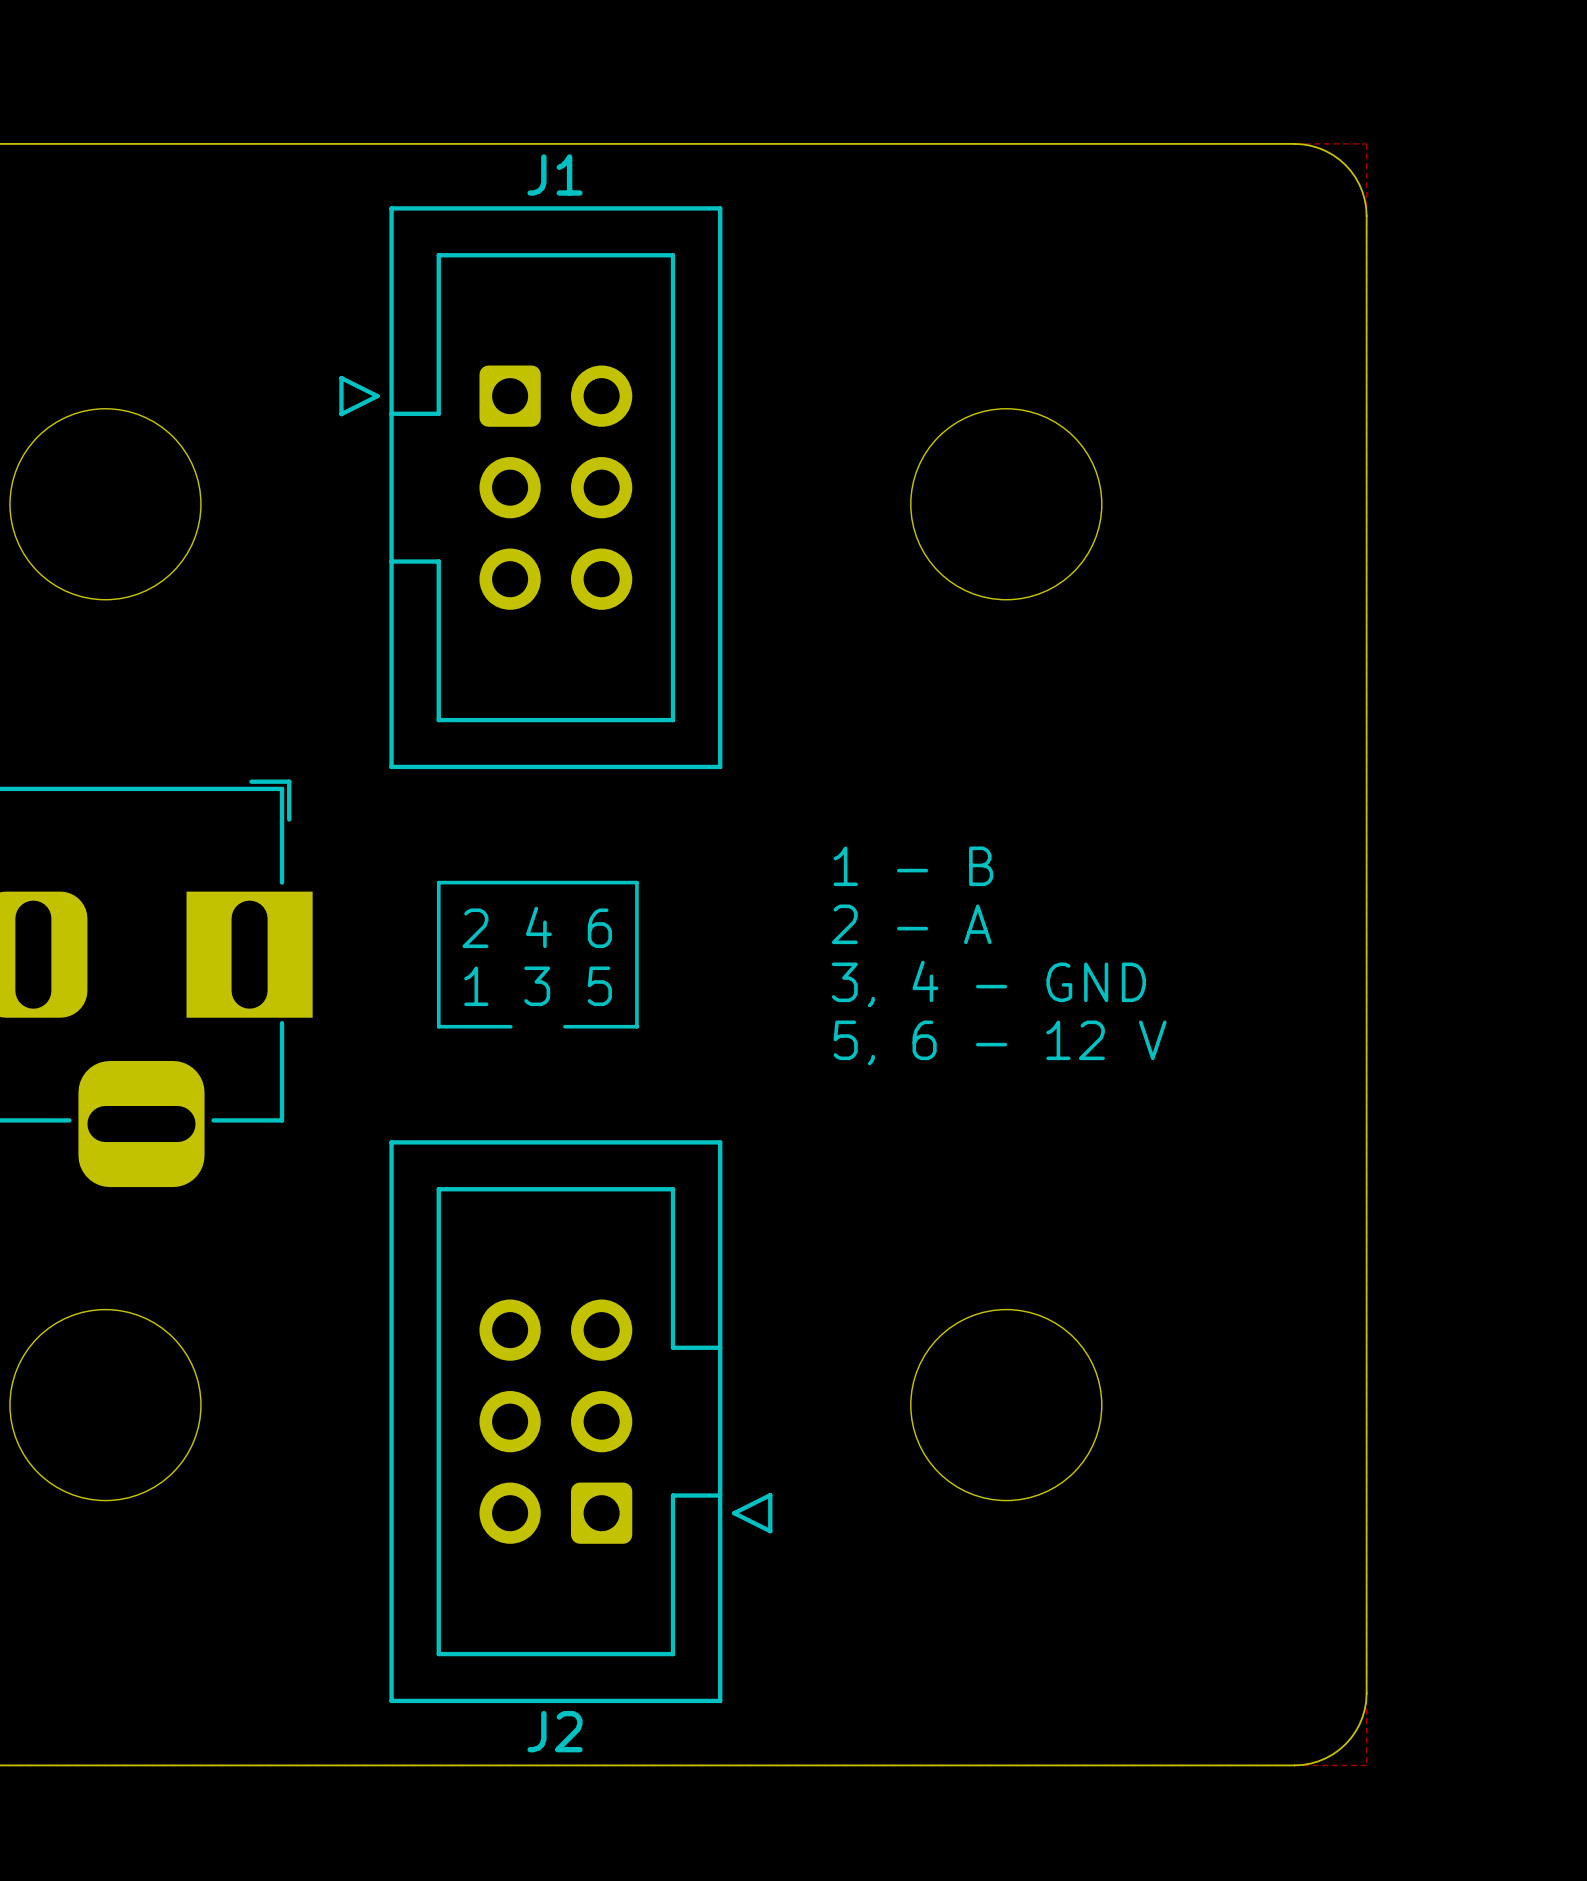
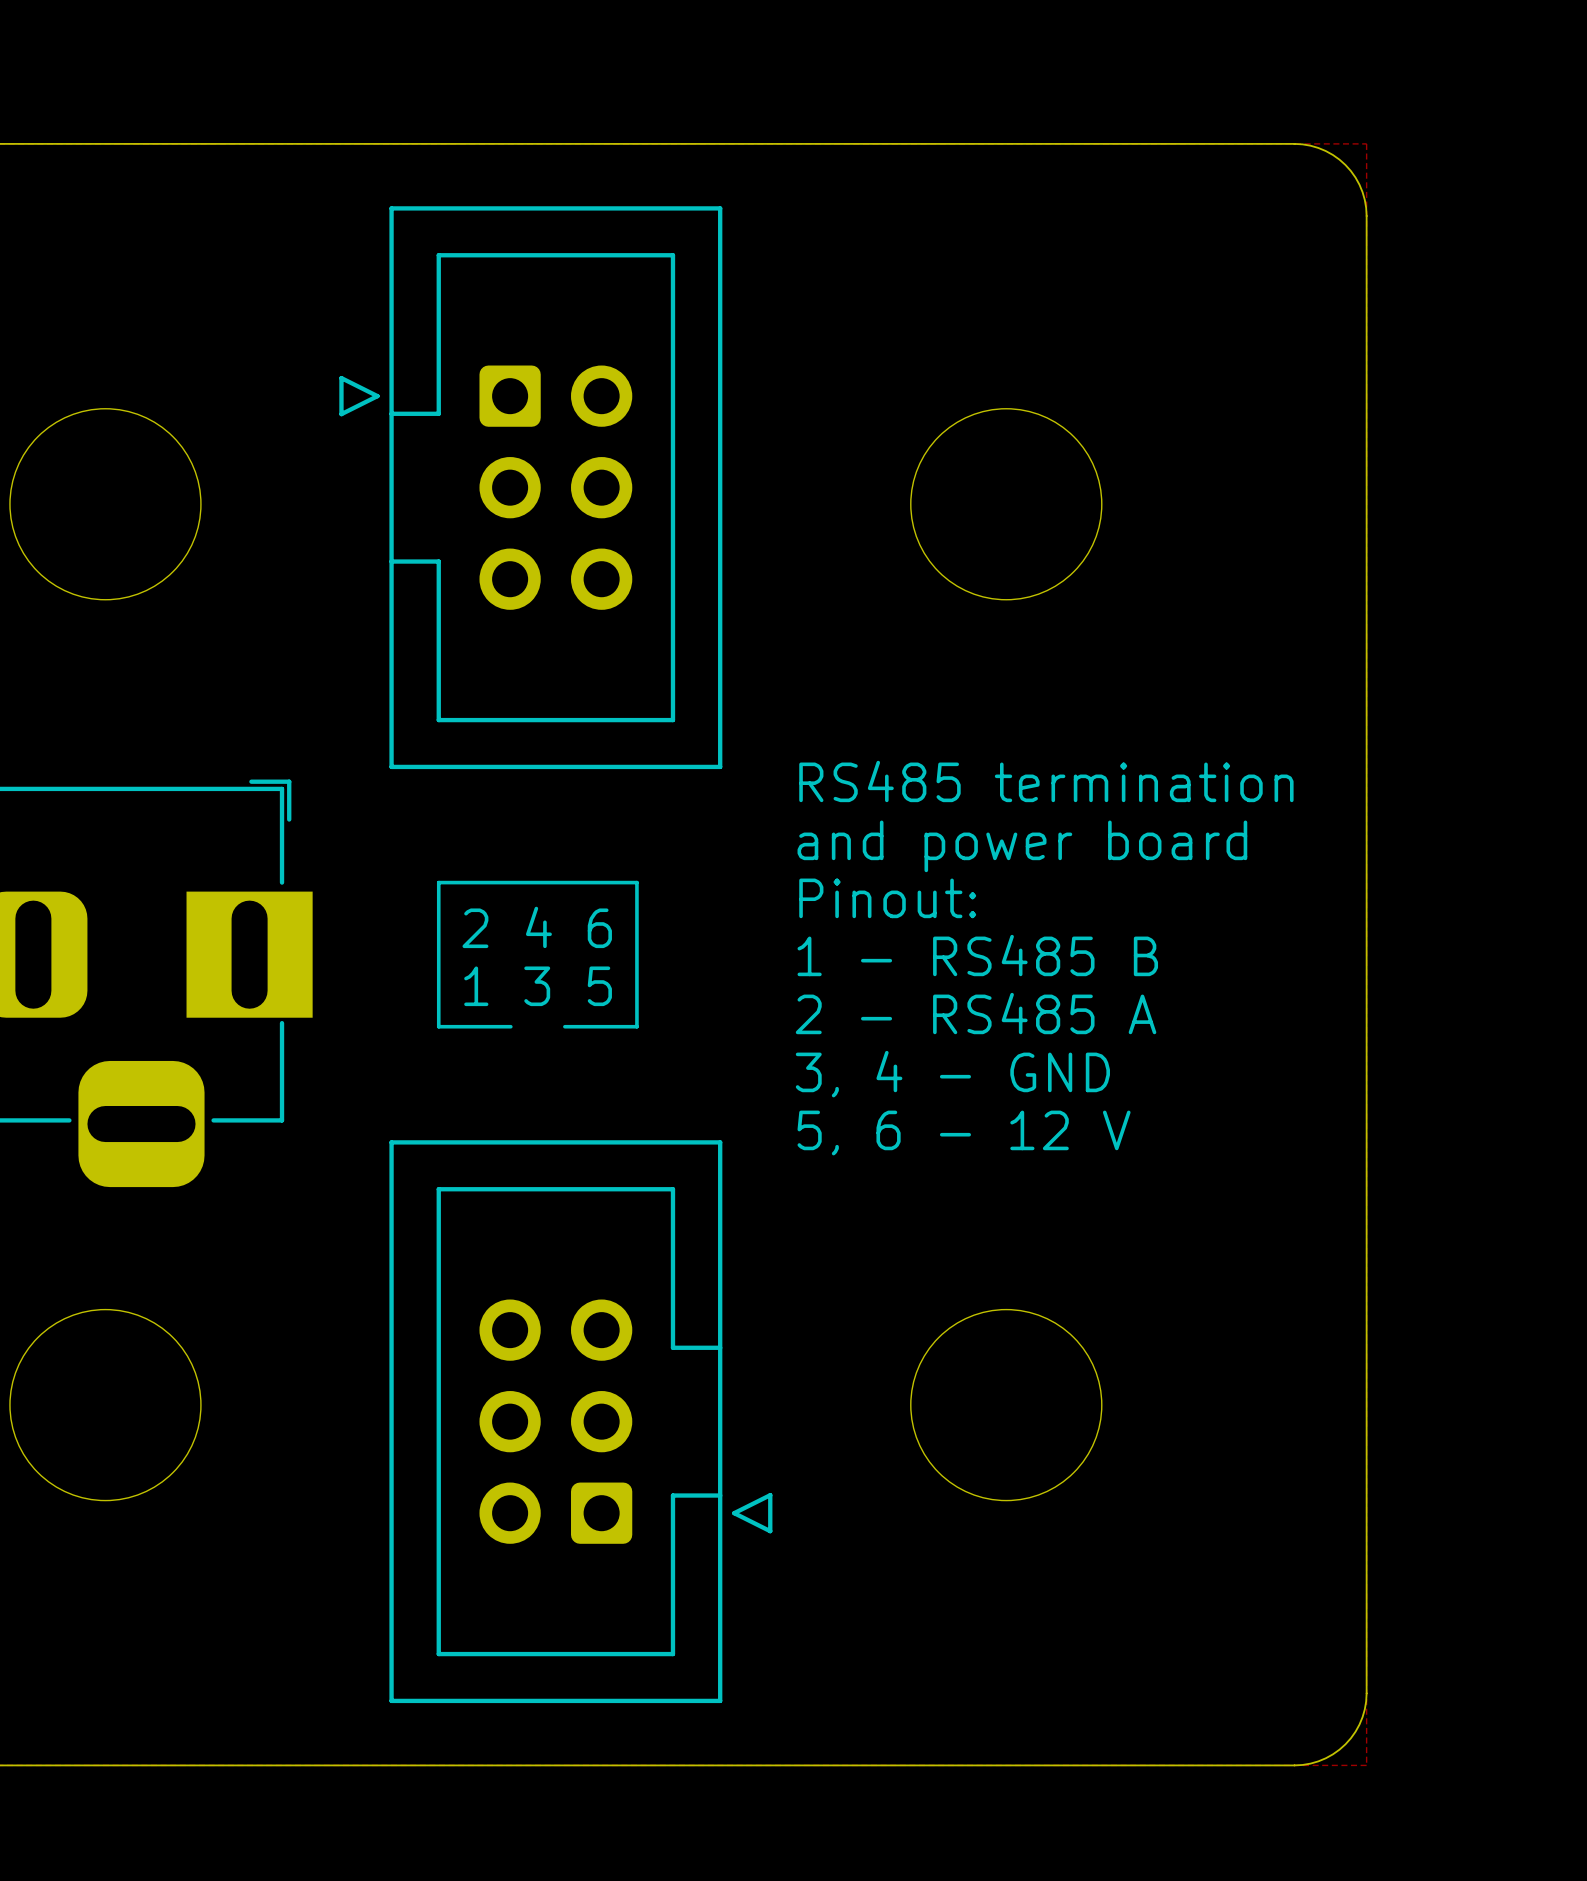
J1 name: J1 (555, 174) -> none
text: none -> RS485 termination (1046, 781)
text: none -> and power board (1022, 846)
text: 1 - B (913, 866) -> none
text: none -> Pinout: (887, 898)
text: 2 - A (911, 924) -> none
text: none -> 1 - RS485 B (977, 955)
text position: 3, 4 - GND (988, 984) -> 3, 4 - GND (952, 1074)
text: none -> 2 - RS485 A (976, 1013)
text position: 5, 6 - 12 V (1000, 1042) -> 5, 6 - 12 V (964, 1132)
J2 name: J2 (555, 1731) -> none

